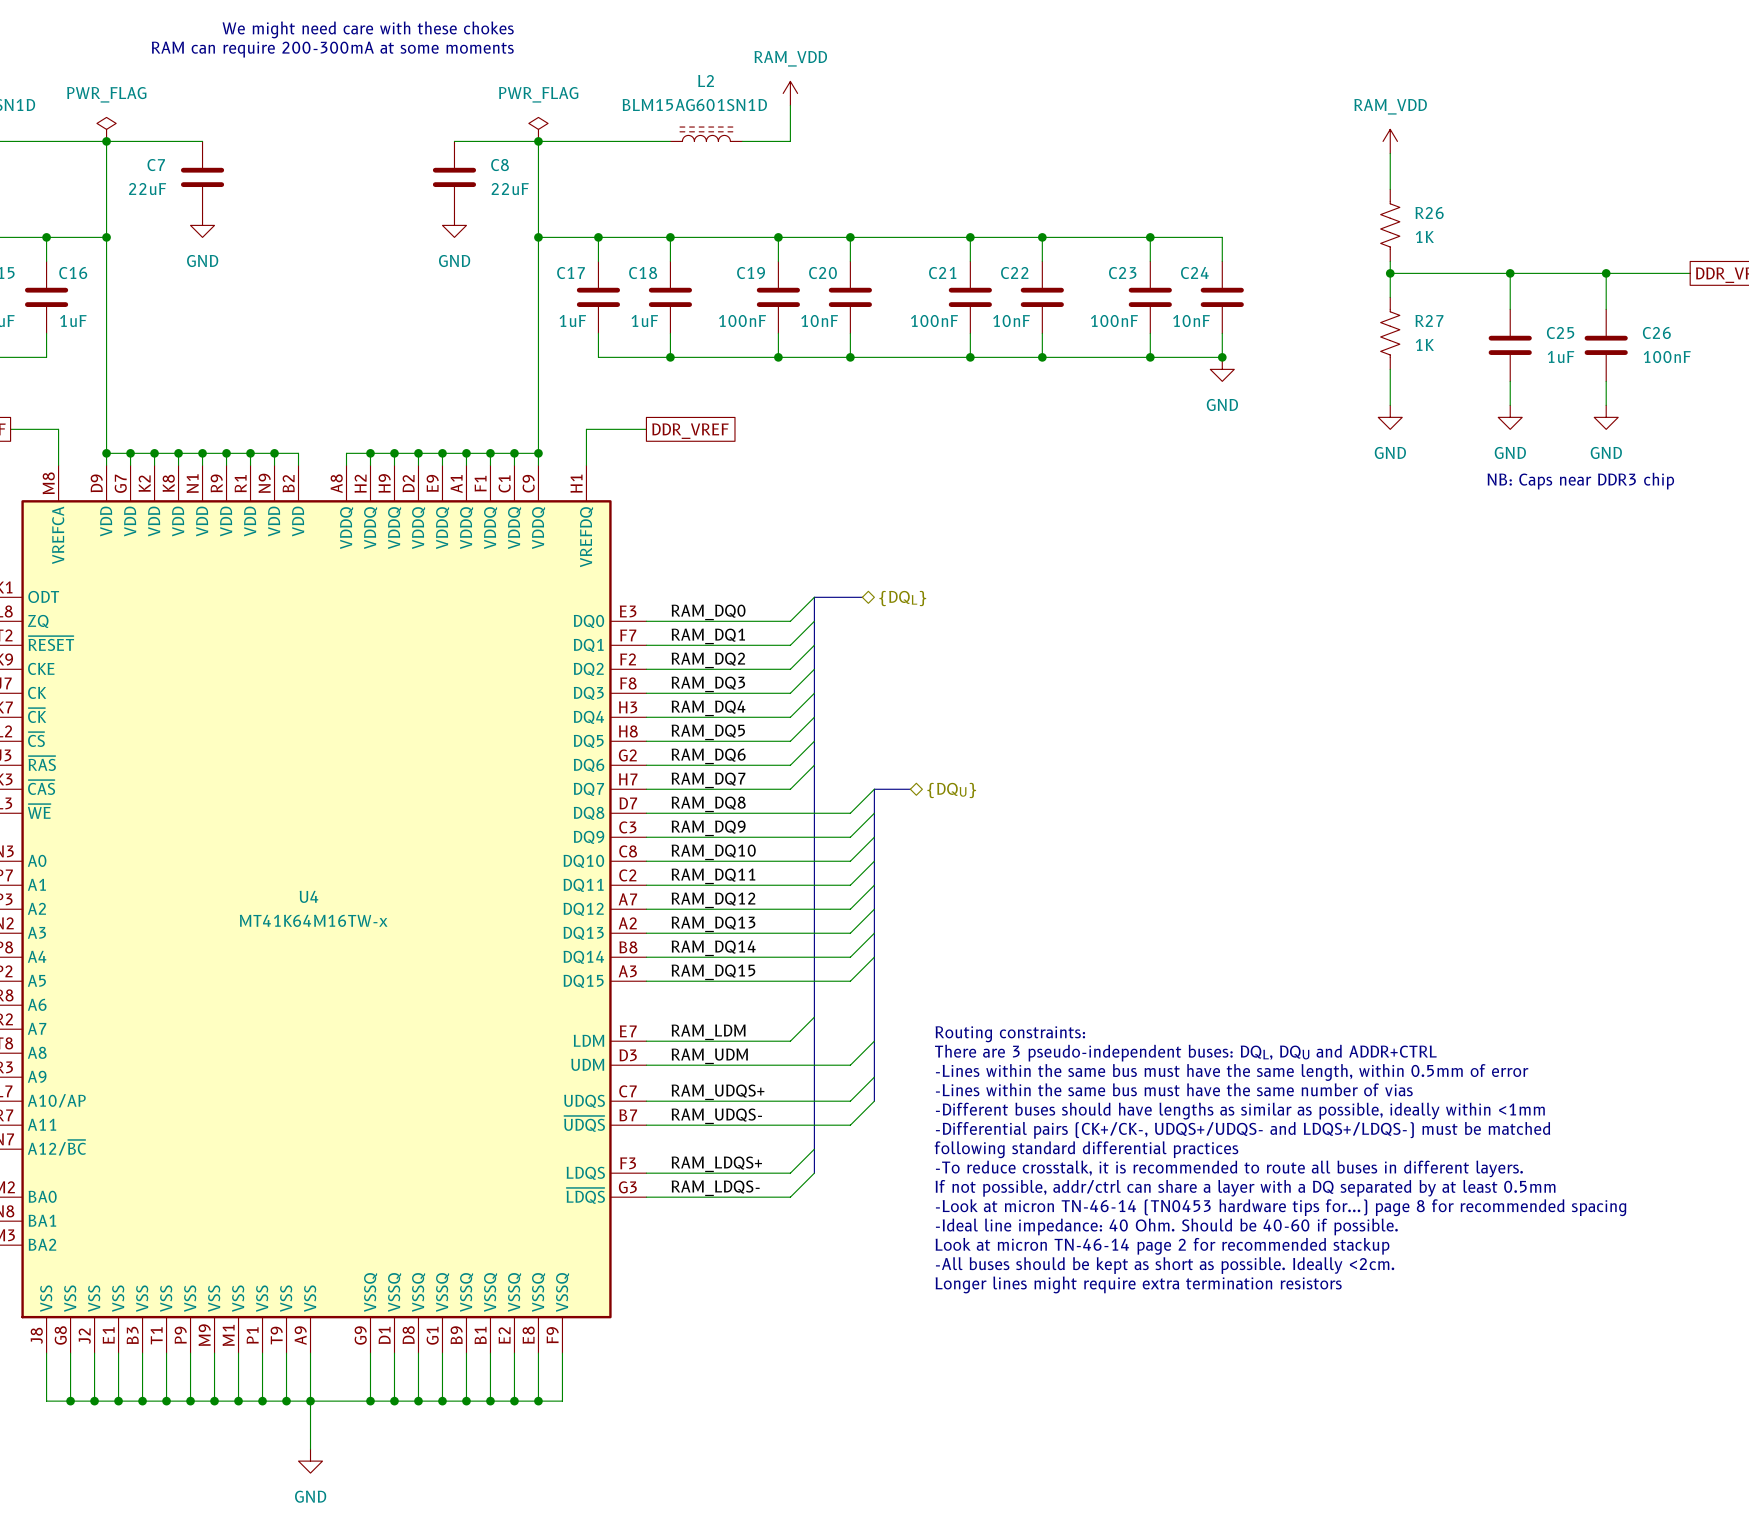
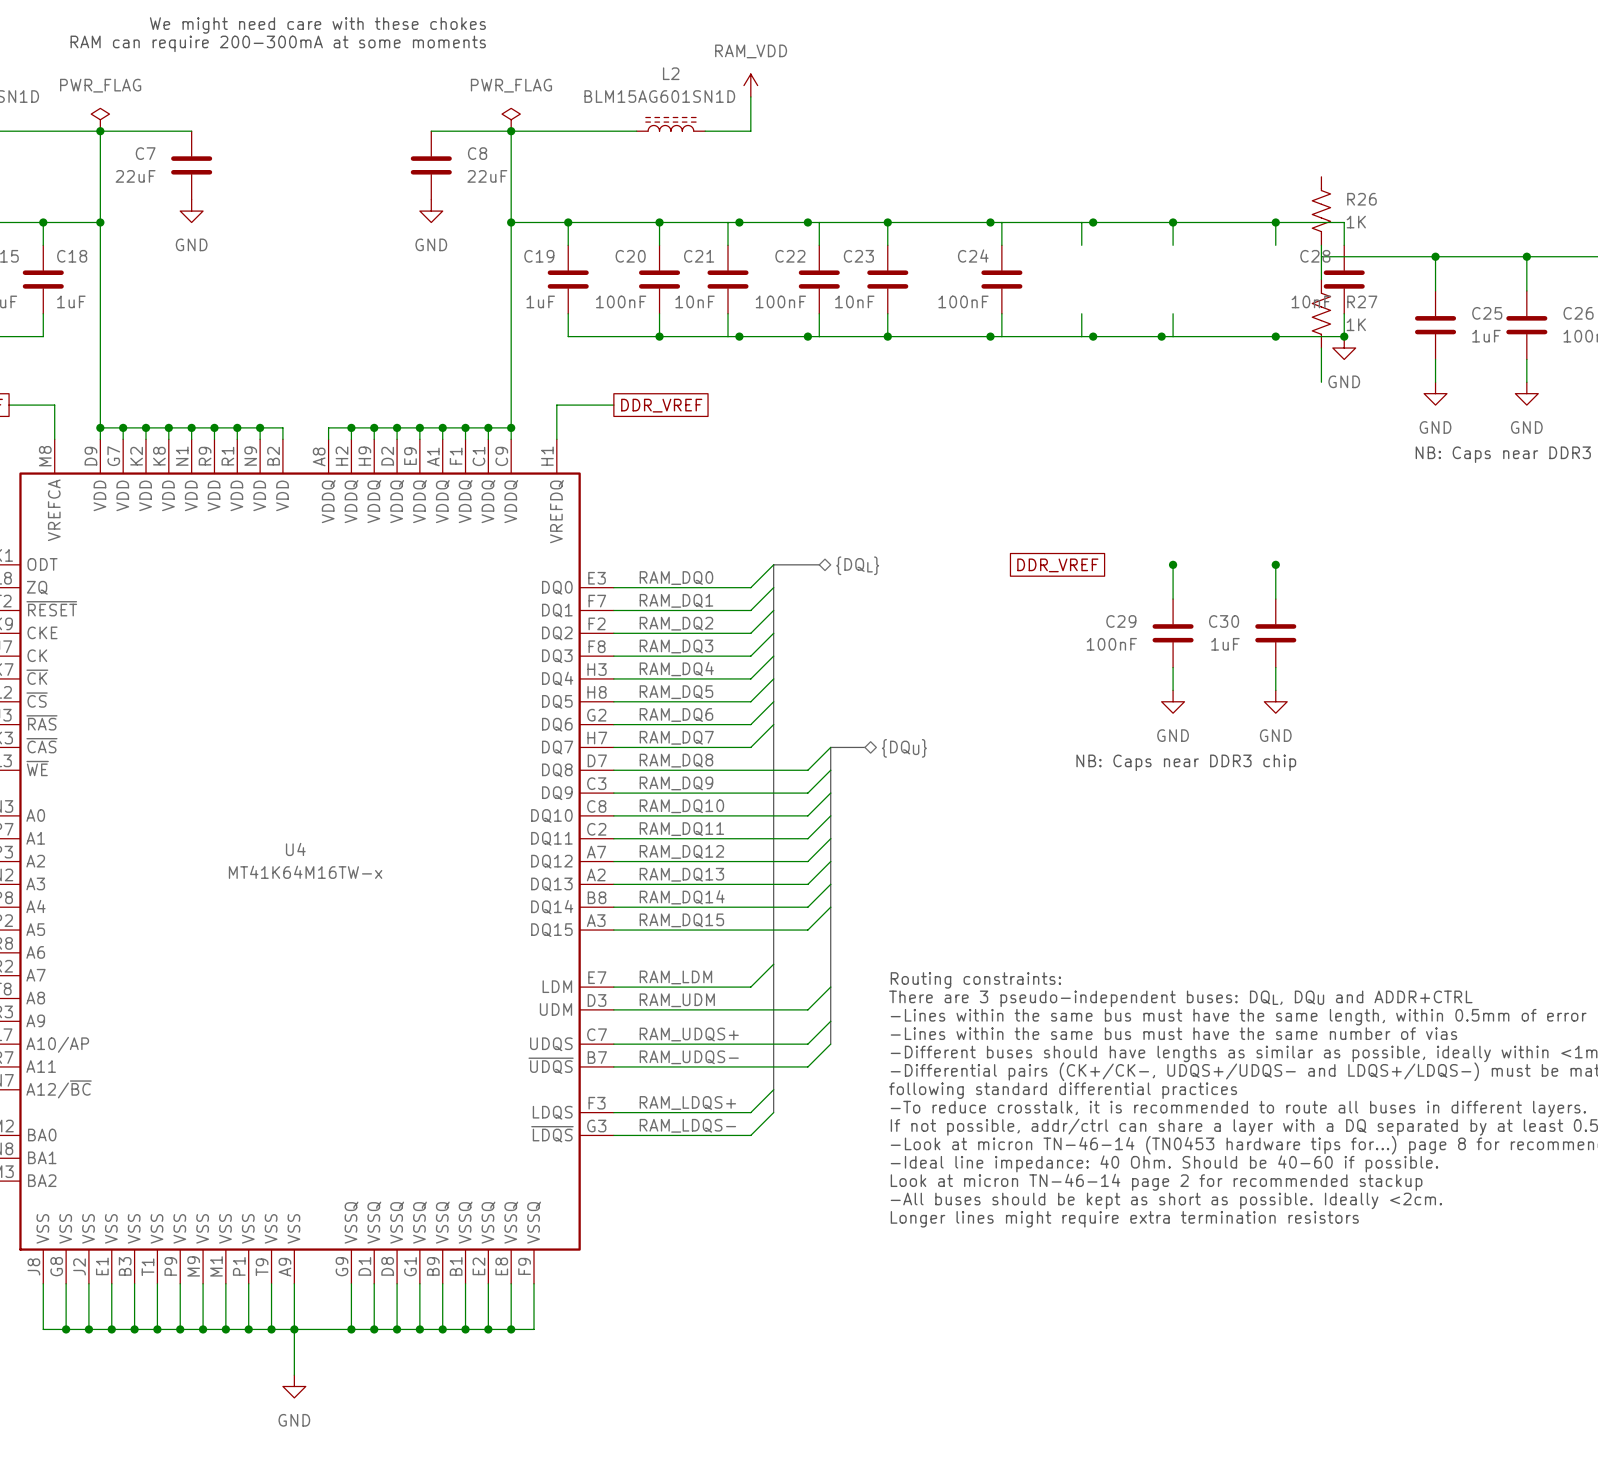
power symbol: RAM_VDD (1390, 141) -> none
wire: (1390, 153) (1390, 189) -> none
wire: (670, 237) (670, 261) -> (728, 222) (728, 245)
junction position: (670, 237) -> (659, 222)
wire: none -> (659, 222) (659, 245)
wire: (778, 237) (778, 261) -> (819, 222) (819, 245)
wire: (850, 237) (850, 261) -> (887, 222) (887, 245)
wire: (970, 237) (970, 261) -> (1001, 222) (1001, 245)
junction position: (970, 237) -> (887, 222)
wire: (1042, 237) (1042, 261) -> (1081, 222) (1081, 245)
wire: (1150, 237) (1150, 261) -> (1173, 222) (1173, 245)
wire: (1222, 237) (1222, 261) -> (1161, 222) (1344, 222) (1344, 245)
junction: none -> (1173, 222)
wire: none -> (1275, 222) (1275, 245)
junction: none -> (1275, 222)
C16 name: C16 (73, 273) -> C18 (72, 256)
C17 name: C17 (571, 273) -> C19 (539, 256)
junction: (1390, 273) -> none
C18: 1uF (670, 297) -> none
C19: 100nF (778, 297) -> none
C20 position: (850, 297) -> (659, 279)
C21 position: (970, 297) -> (728, 279)
C22 position: (1042, 297) -> (819, 279)
C23 position: (1150, 297) -> (887, 279)
C24 position: (1222, 297) -> (1001, 279)
C28: none -> 10nF (1344, 279)
C20 value: 10nF (819, 320) -> 100nF (621, 301)
C21 value: 100nF (934, 320) -> 10nF (695, 301)
C22 value: 10nF (1011, 320) -> 100nF (780, 301)
C23 value: 100nF (1114, 320) -> 10nF (854, 301)
C24 value: 10nF (1191, 320) -> 100nF (963, 301)
wire: (670, 333) (670, 357) -> (728, 313) (728, 336)
wire: none -> (659, 313) (659, 336)
wire: (778, 333) (778, 357) -> (819, 313) (819, 336)
wire: (850, 333) (850, 357) -> (887, 313) (887, 336)
wire: (970, 333) (970, 357) -> (1001, 313) (1001, 336)
wire: (1042, 333) (1042, 357) -> (1081, 313) (1081, 336)
wire: (1150, 333) (1150, 357) -> (1173, 313) (1173, 336)
wire: (1222, 333) (1222, 357) -> (1344, 313) (1344, 336) (1161, 336)
junction position: (670, 357) -> (659, 336)
junction position: (970, 357) -> (887, 336)
junction: none -> (1275, 336)
junction: none -> (1344, 336)
power symbol: GND (1222, 369) -> none
power symbol position: GND (1390, 417) -> GND (1344, 348)
wire: none -> (1173, 564) (1173, 599)
junction: none -> (1173, 564)
wire: none -> (1275, 564) (1275, 599)
junction: none -> (1275, 564)
global label: none -> DDR_VREF (1057, 565)
C29: none -> 100nF (1173, 633)
C30: none -> 1uF (1275, 633)
wire: none -> (1173, 667) (1173, 690)
wire: none -> (1275, 667) (1275, 690)
power symbol: none -> GND (1173, 701)
power symbol: none -> GND (1275, 701)
text: none -> NB: Caps near DDR3 chip (1186, 762)

